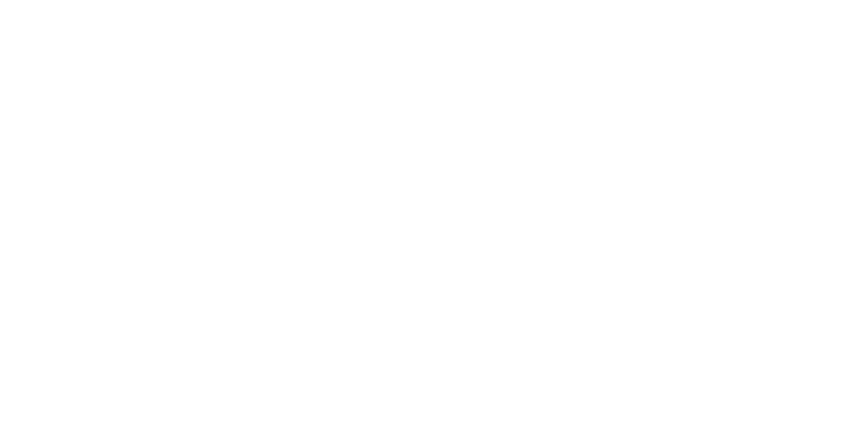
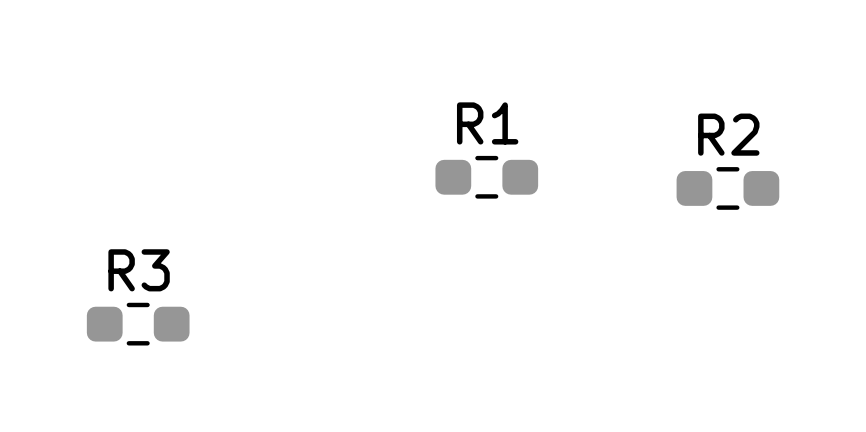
R1: none -> (486, 177)
R2: none -> (727, 188)
R3: none -> (138, 324)

